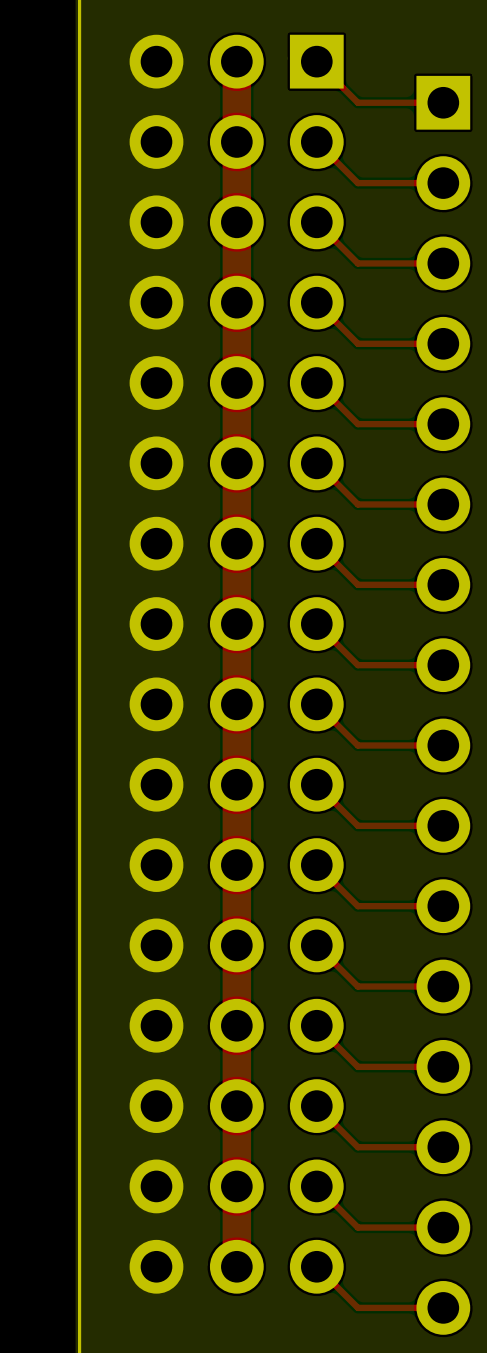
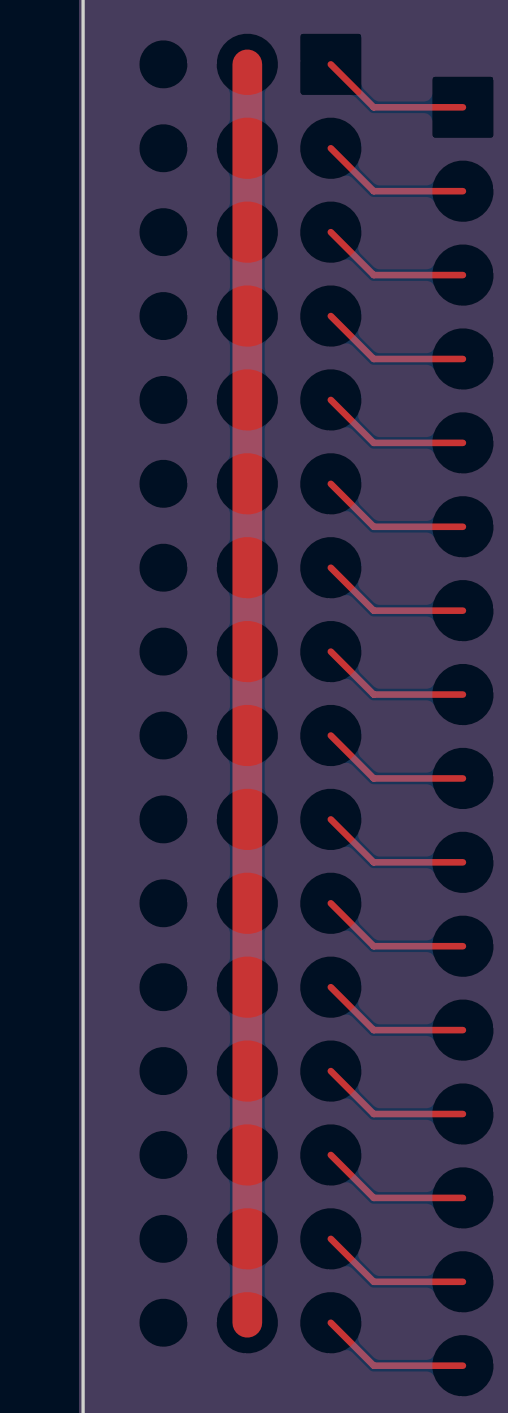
part: (236, 664) -> none
part: (443, 705) -> none

